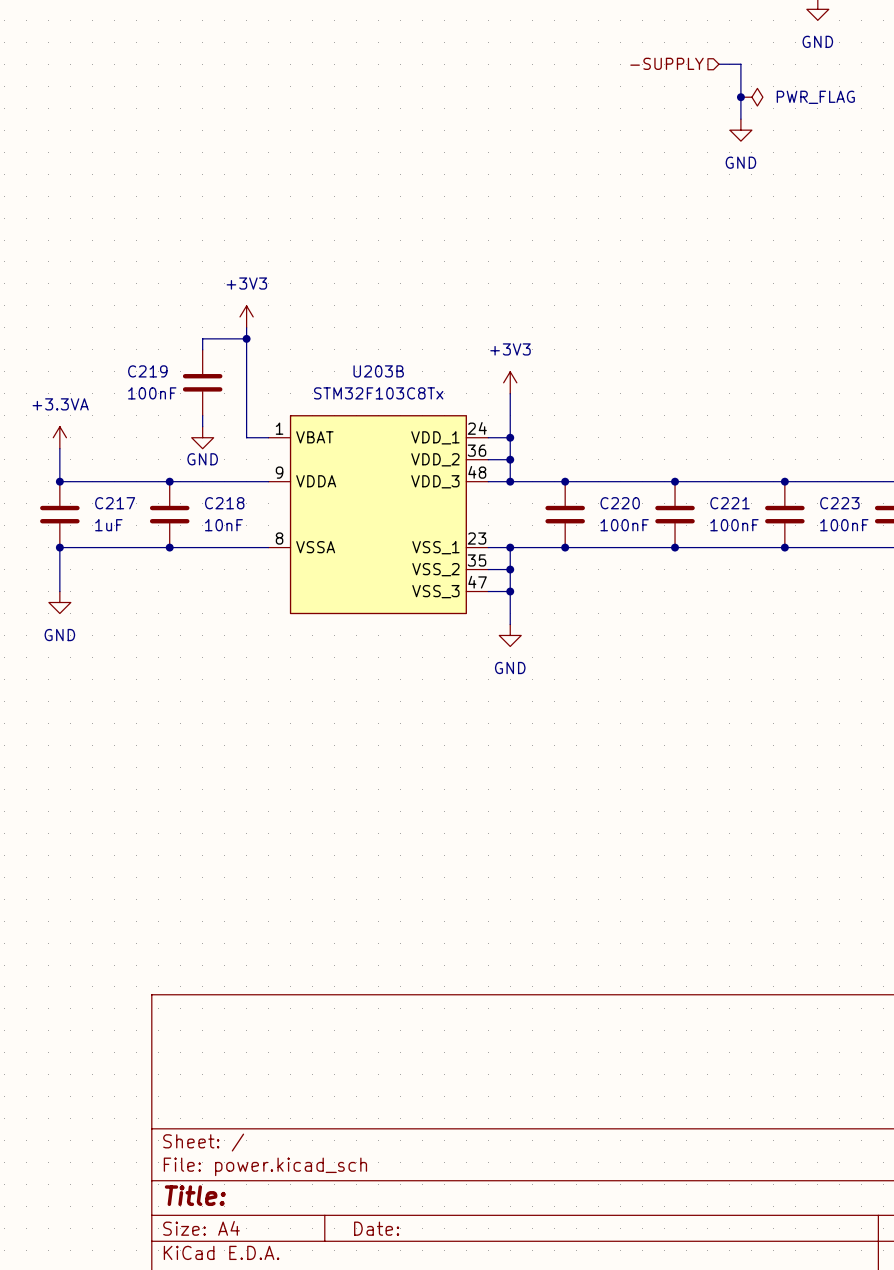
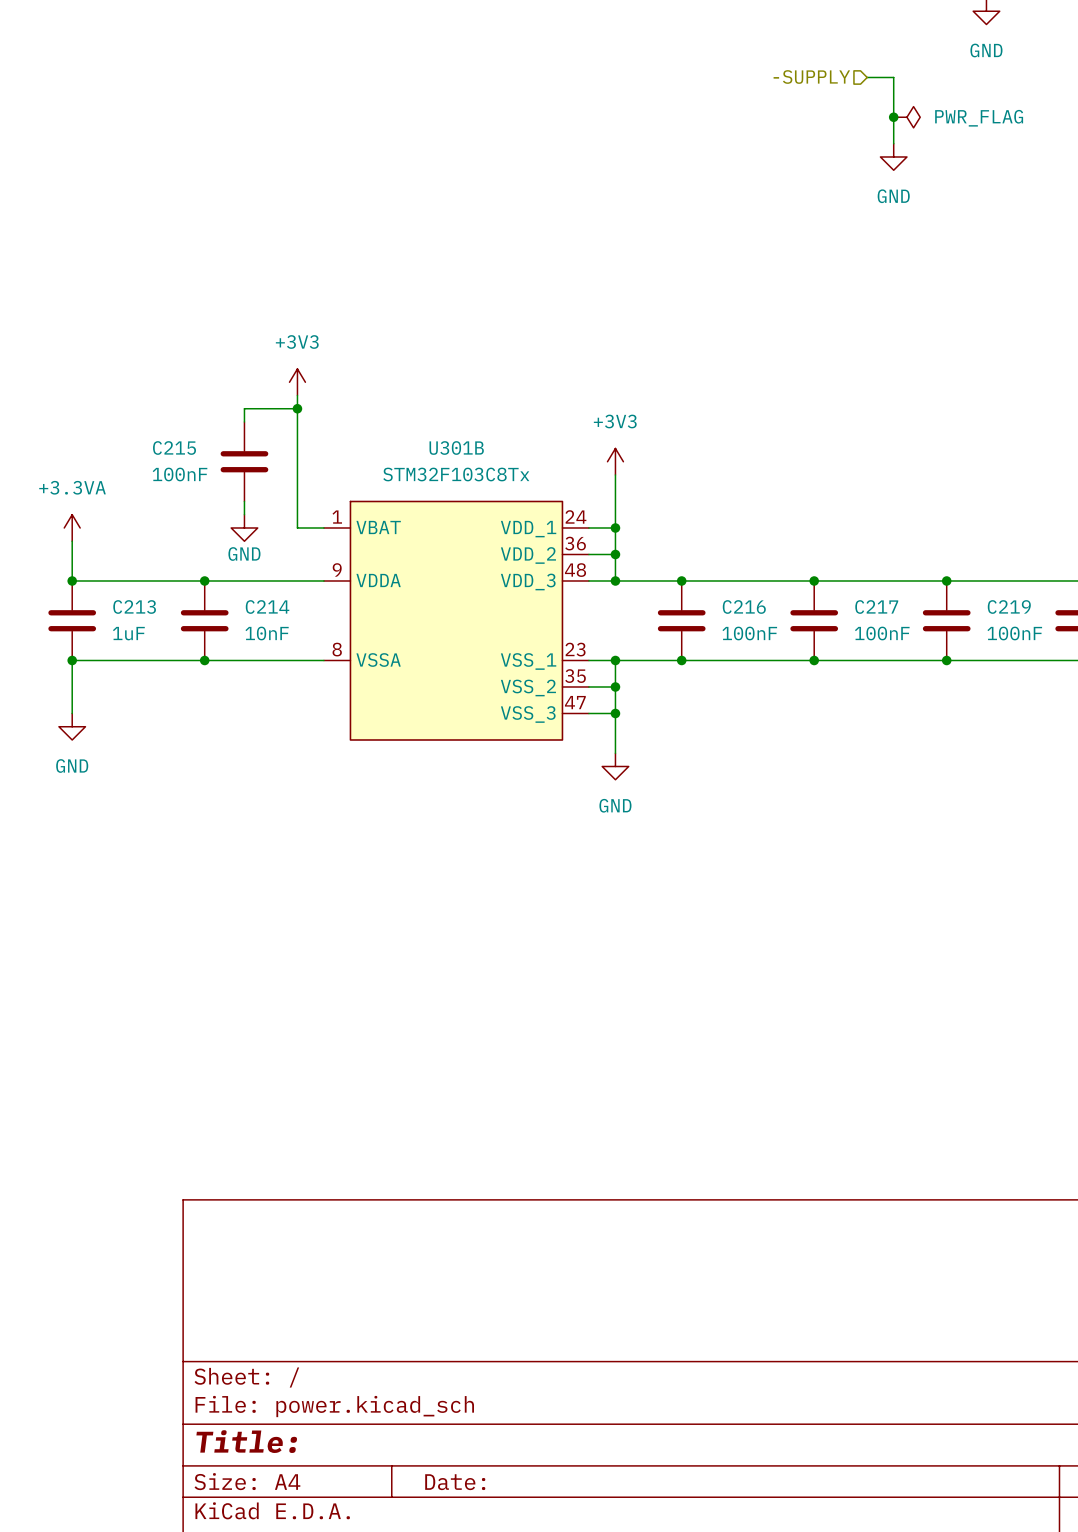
C219 name: C219 (147, 371) -> C215 (174, 448)
U203B name: U203B (378, 371) -> U301B (456, 448)
C217 name: C217 (115, 503) -> C213 (134, 607)
C218 name: C218 (224, 503) -> C214 (267, 607)
C220 name: C220 (620, 503) -> C216 (744, 607)
C221 name: C221 (730, 503) -> C217 (876, 607)
C223 name: C223 (839, 503) -> C219 (1009, 607)

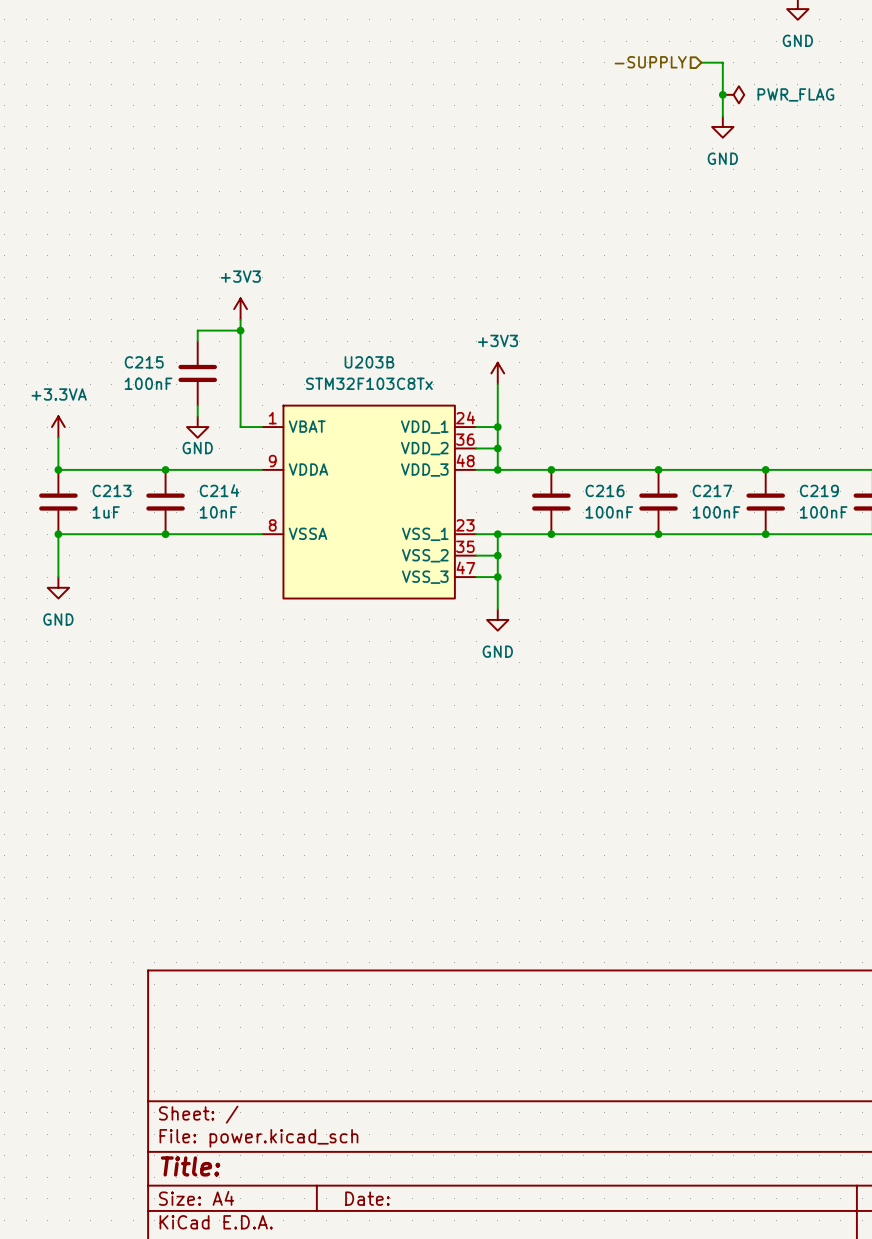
U301B name: U301B (456, 448) -> U203B (369, 362)

